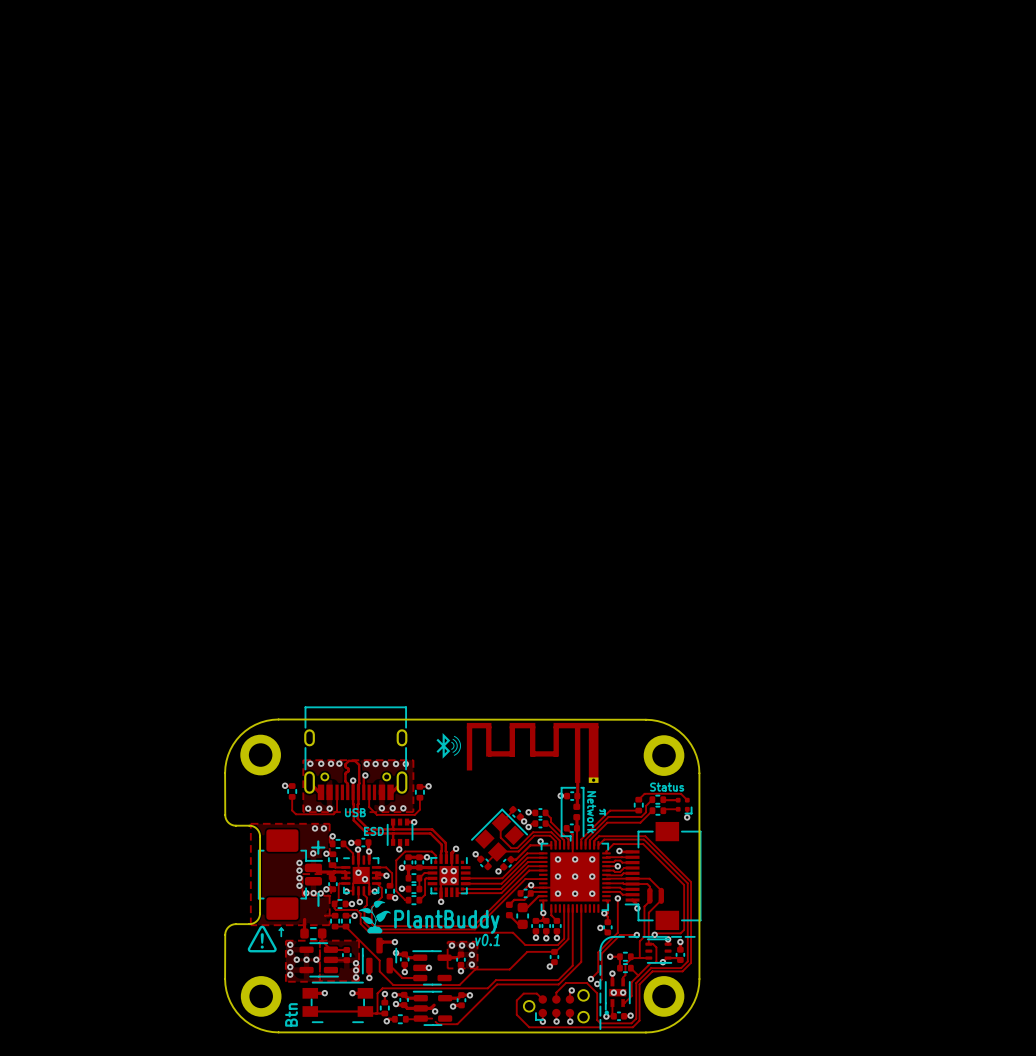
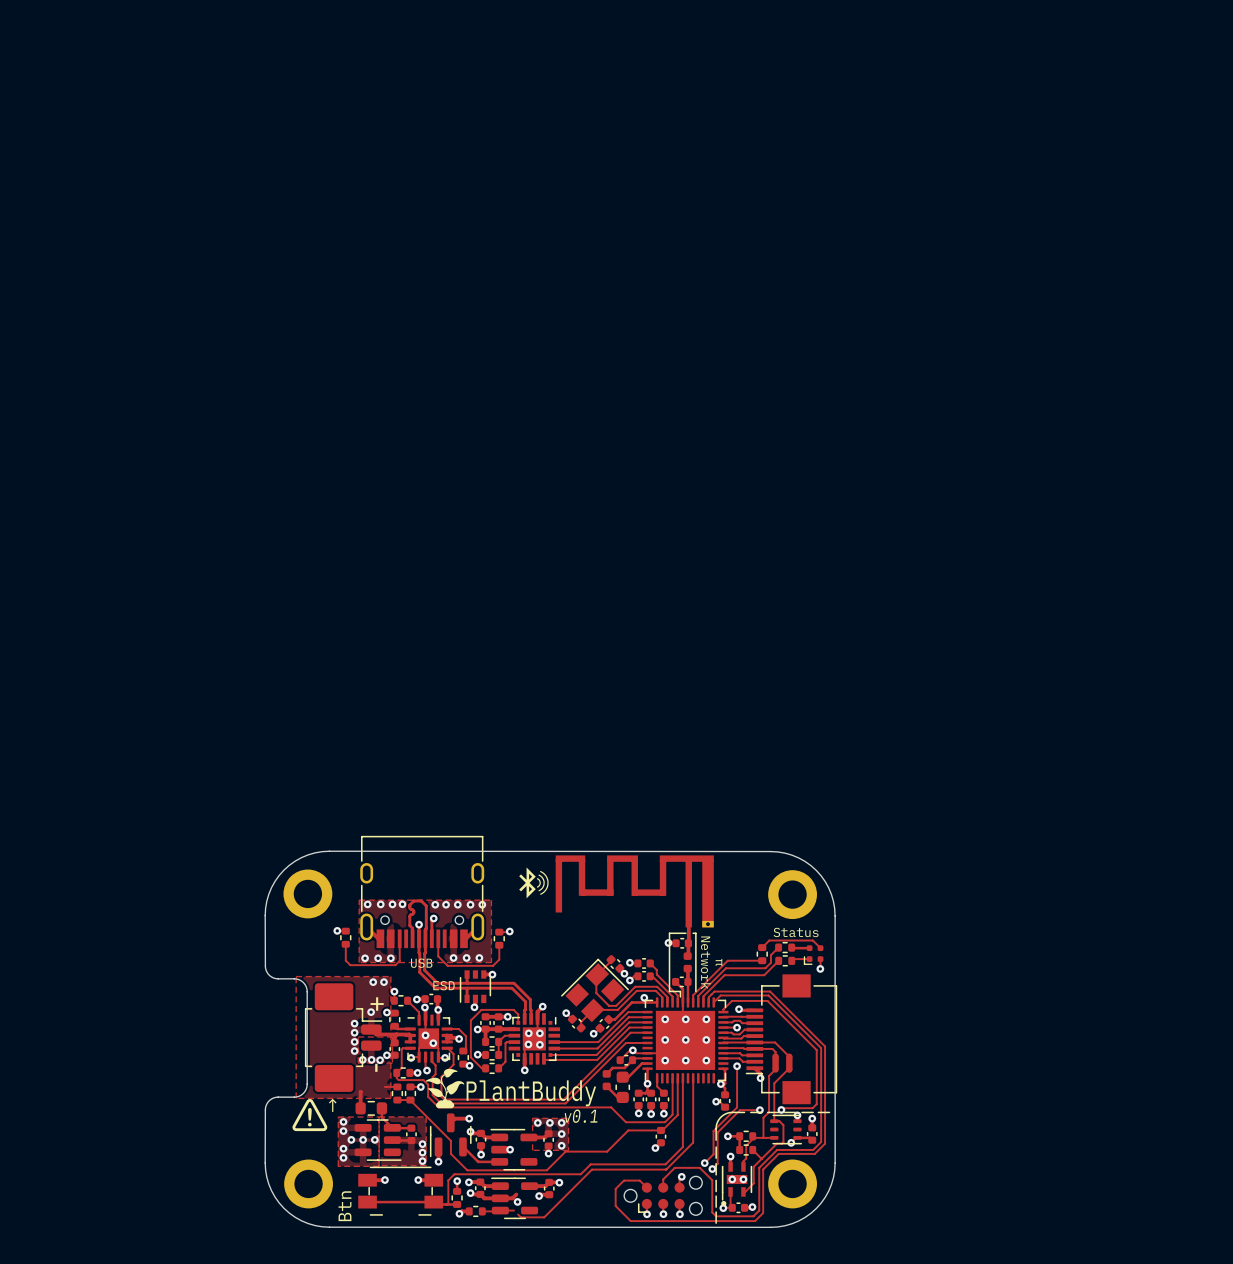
part rotation: 0° (683, 805) -> 90° clockwise (813, 955)

